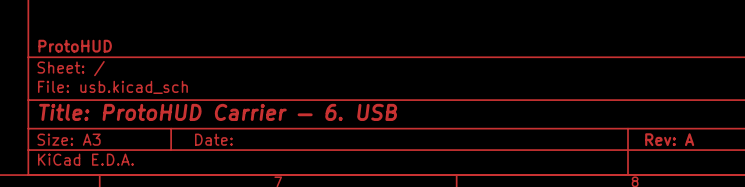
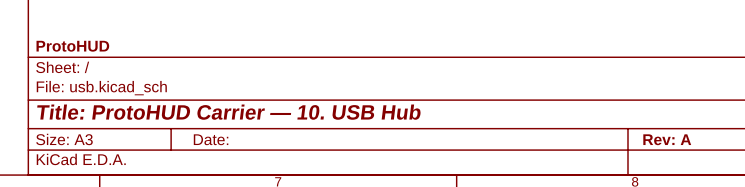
title block: Title: ProtoHUD Carrier — 6. USB (218, 112) -> Title: ProtoHUD Carrier — 10. USB Hub (229, 112)

